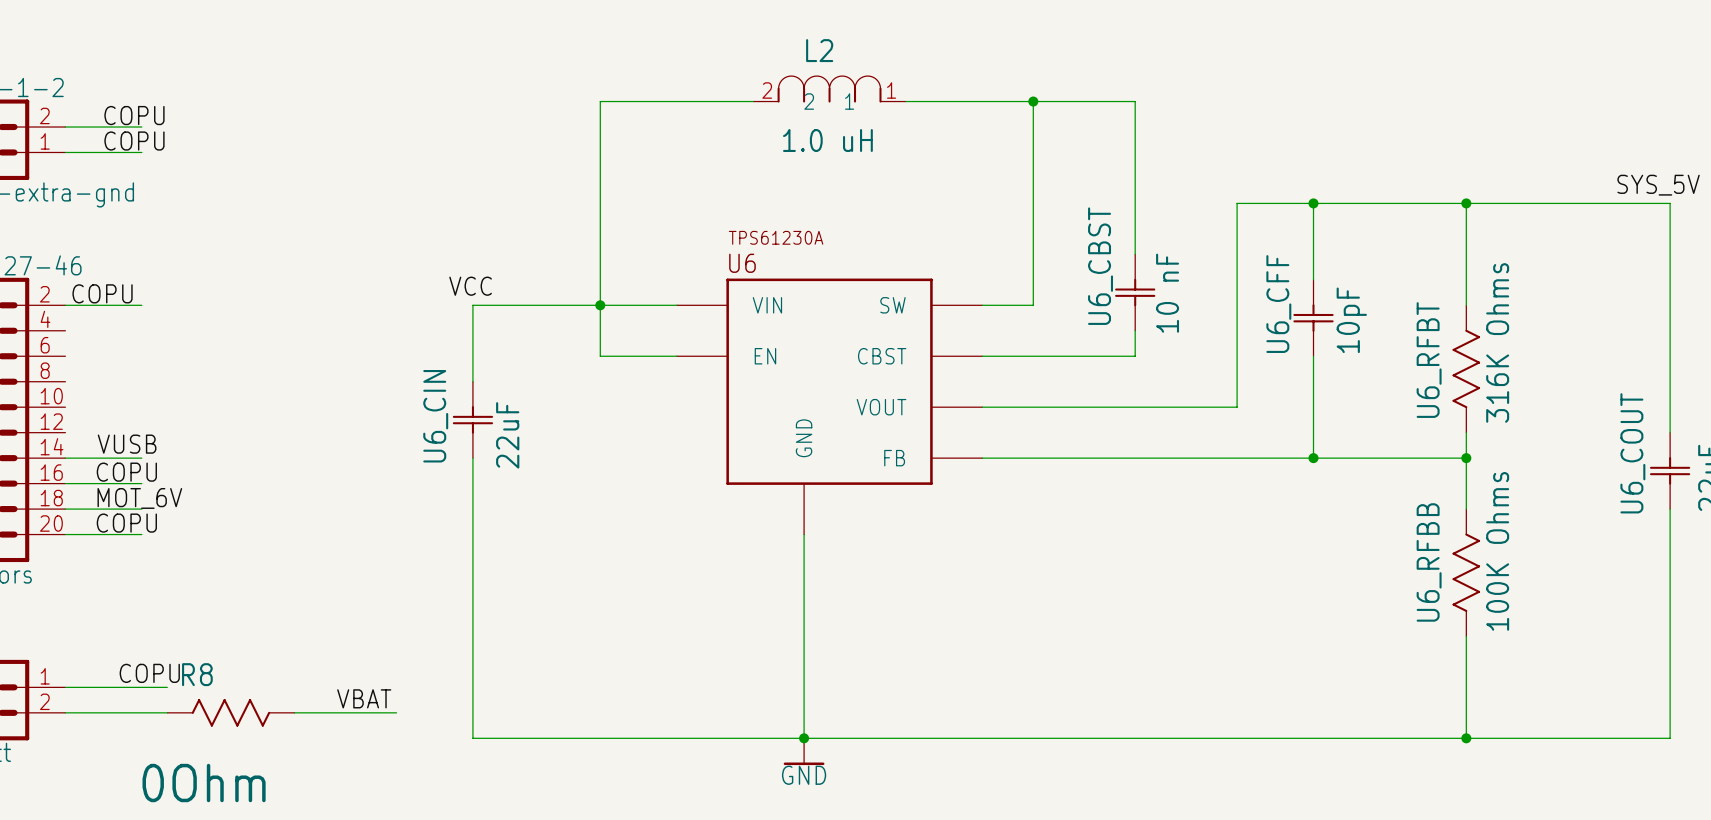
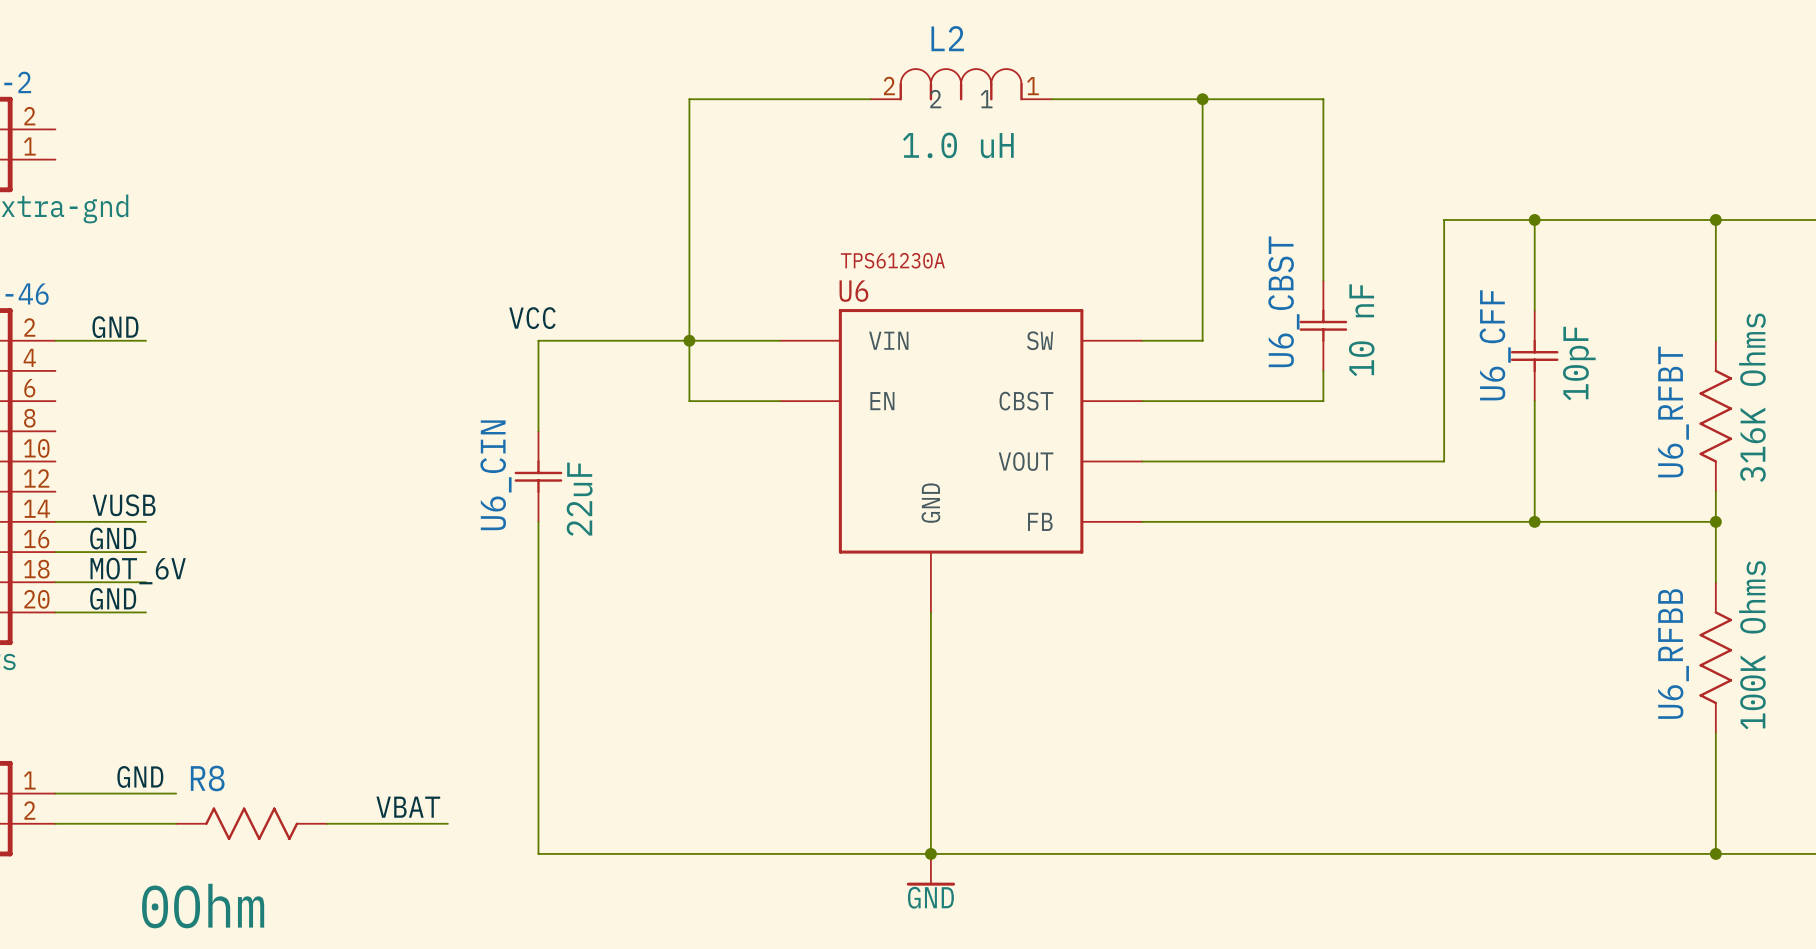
label: COPU (134, 115) -> none
wire: (65, 127) (141, 127) -> none
label: COPU (134, 141) -> none
wire: (65, 152) (141, 152) -> none
label: COPU (102, 293) -> GND (115, 327)
label: COPU (126, 472) -> GND (113, 538)
label: COPU (126, 523) -> GND (113, 598)
label: COPU (149, 673) -> GND (140, 776)

